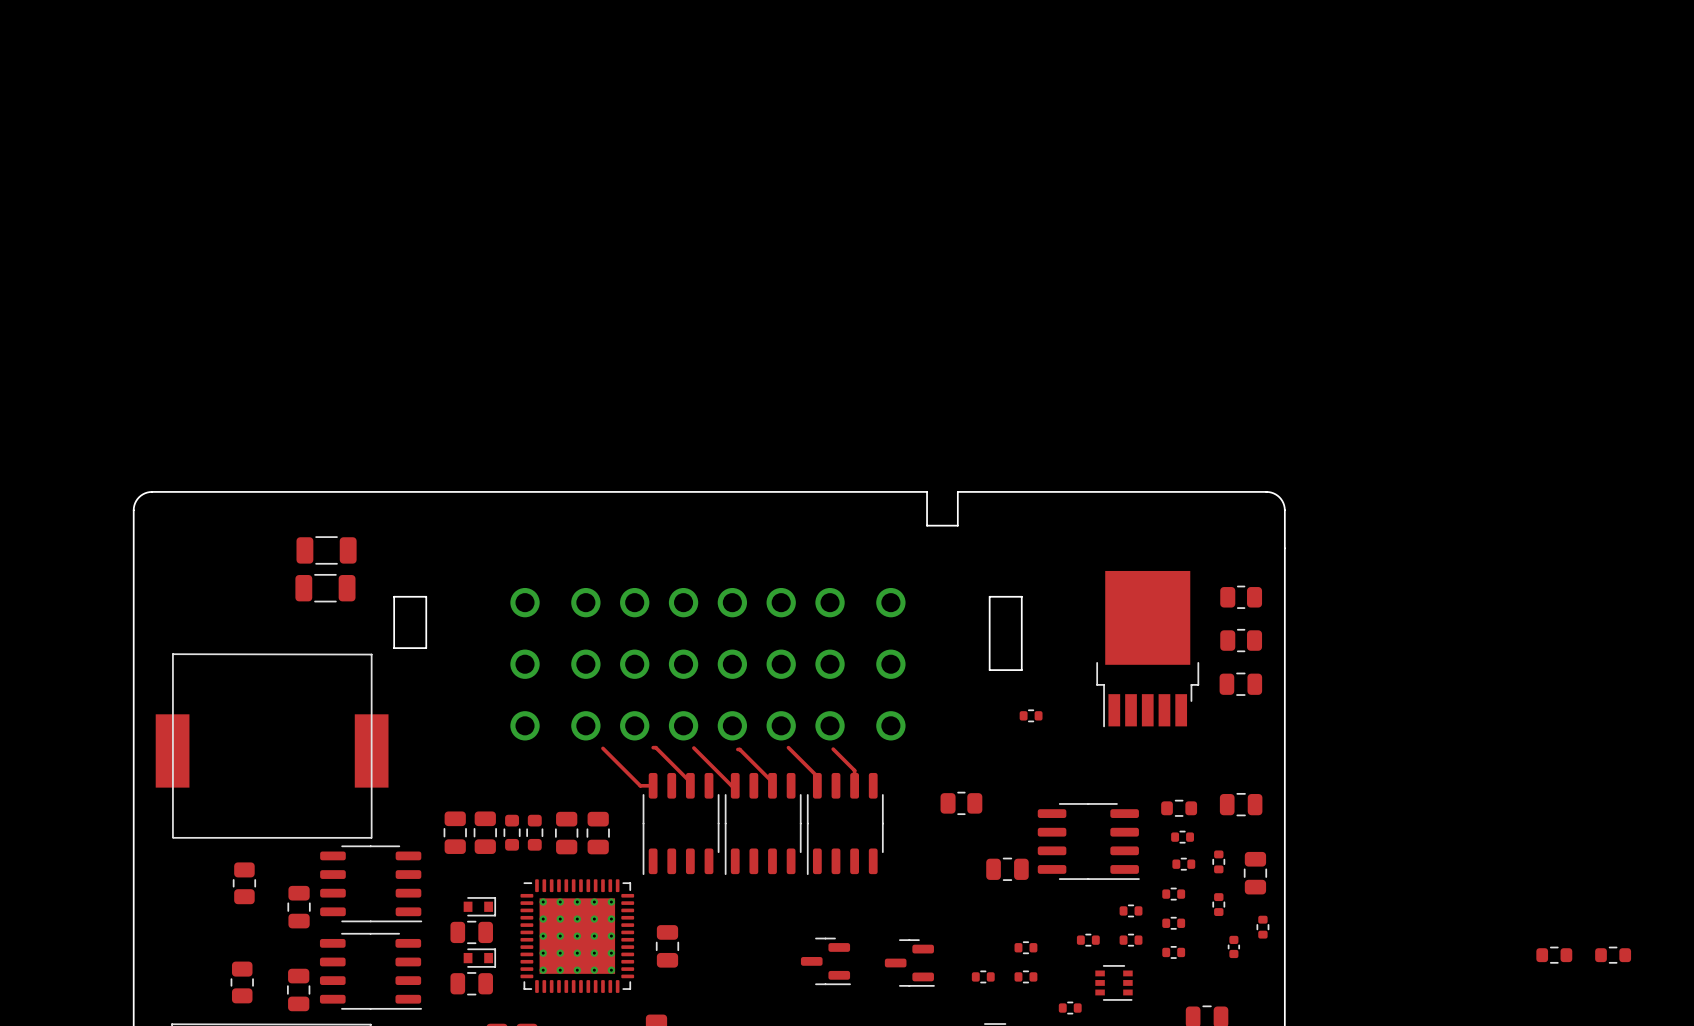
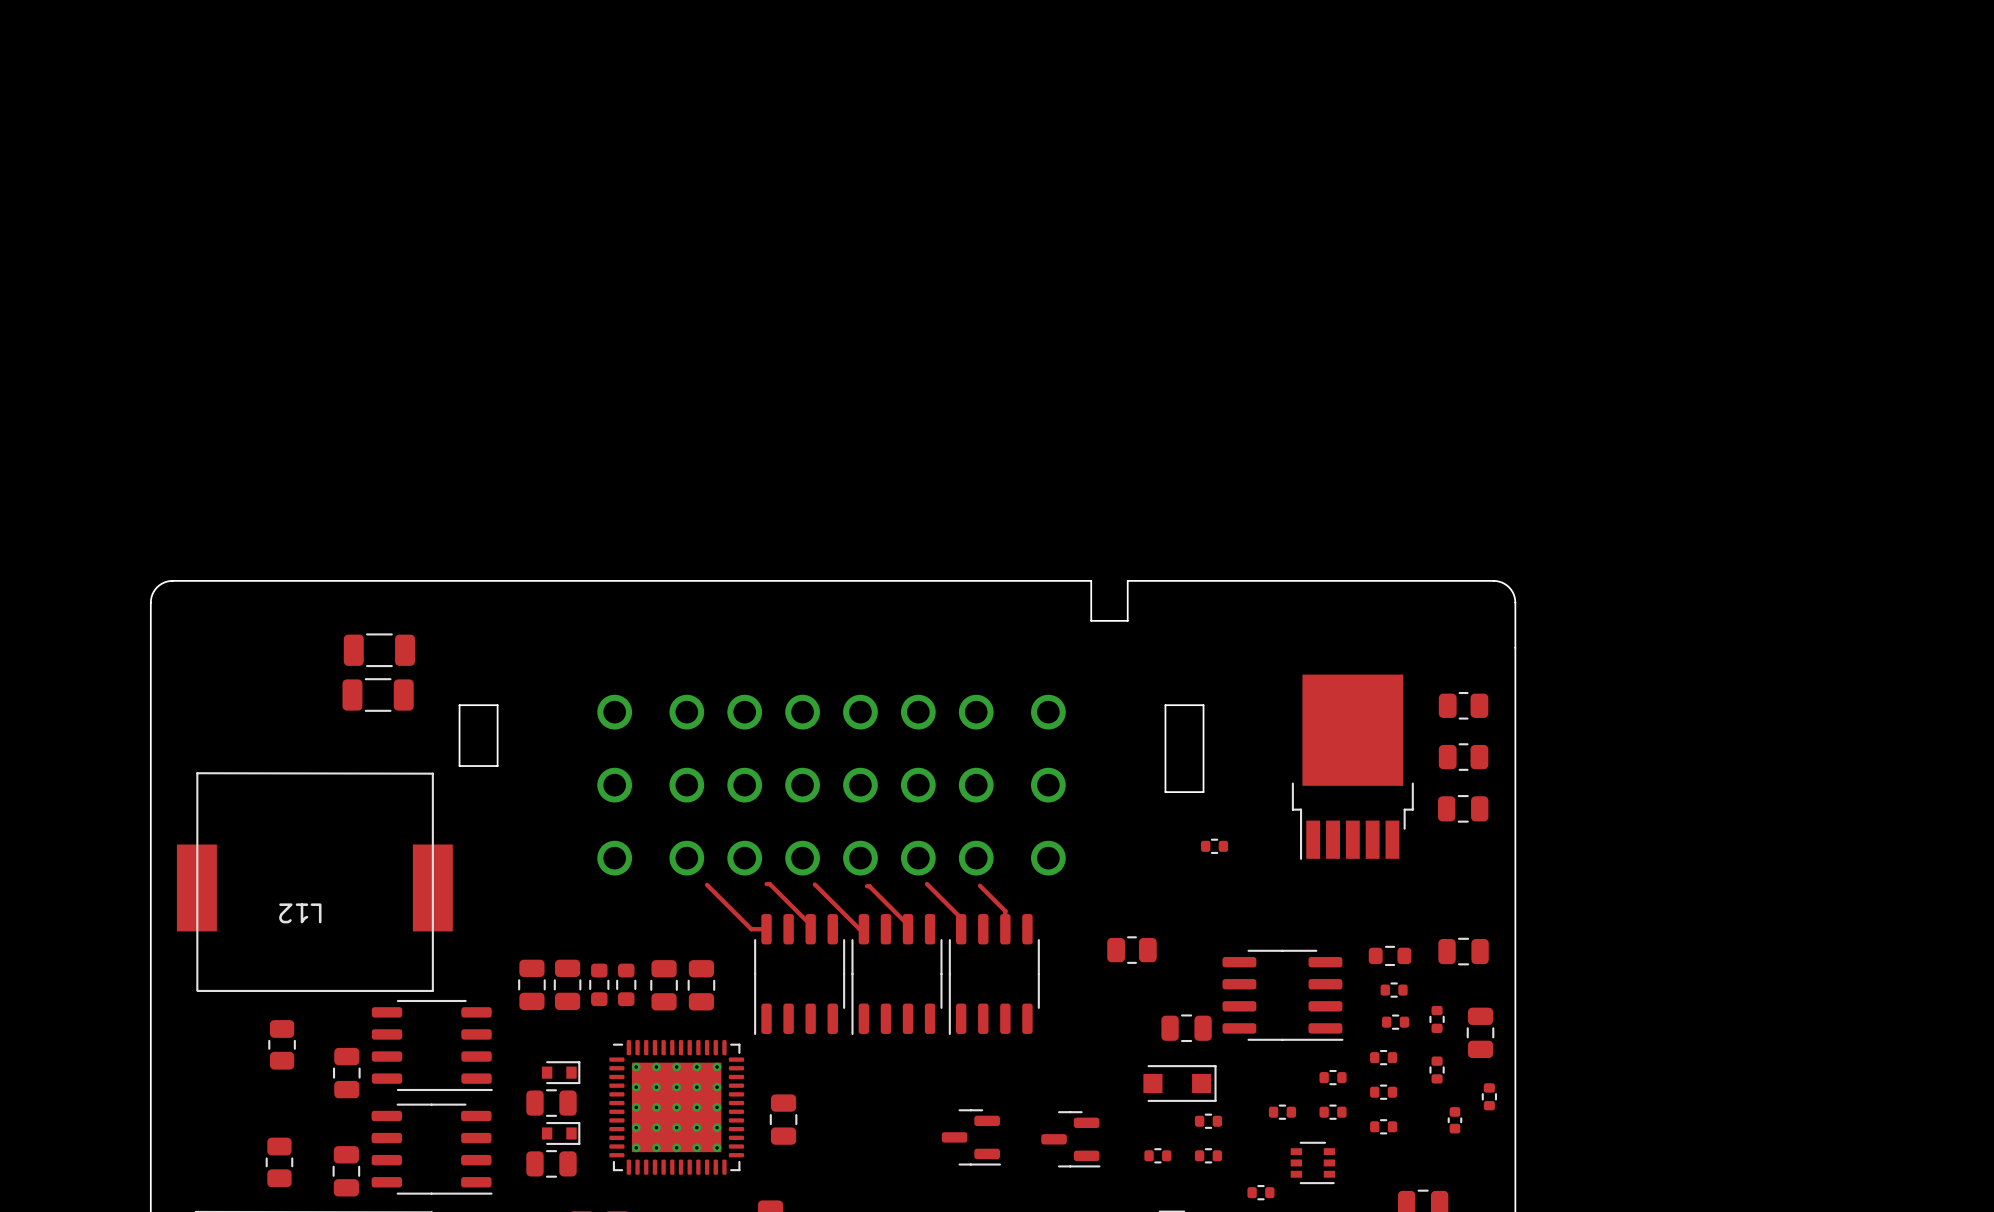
L12 name: none -> L12 (300, 913)
part: none -> (1179, 1083)
part: (1554, 955) -> none
part: (1613, 955) -> none

